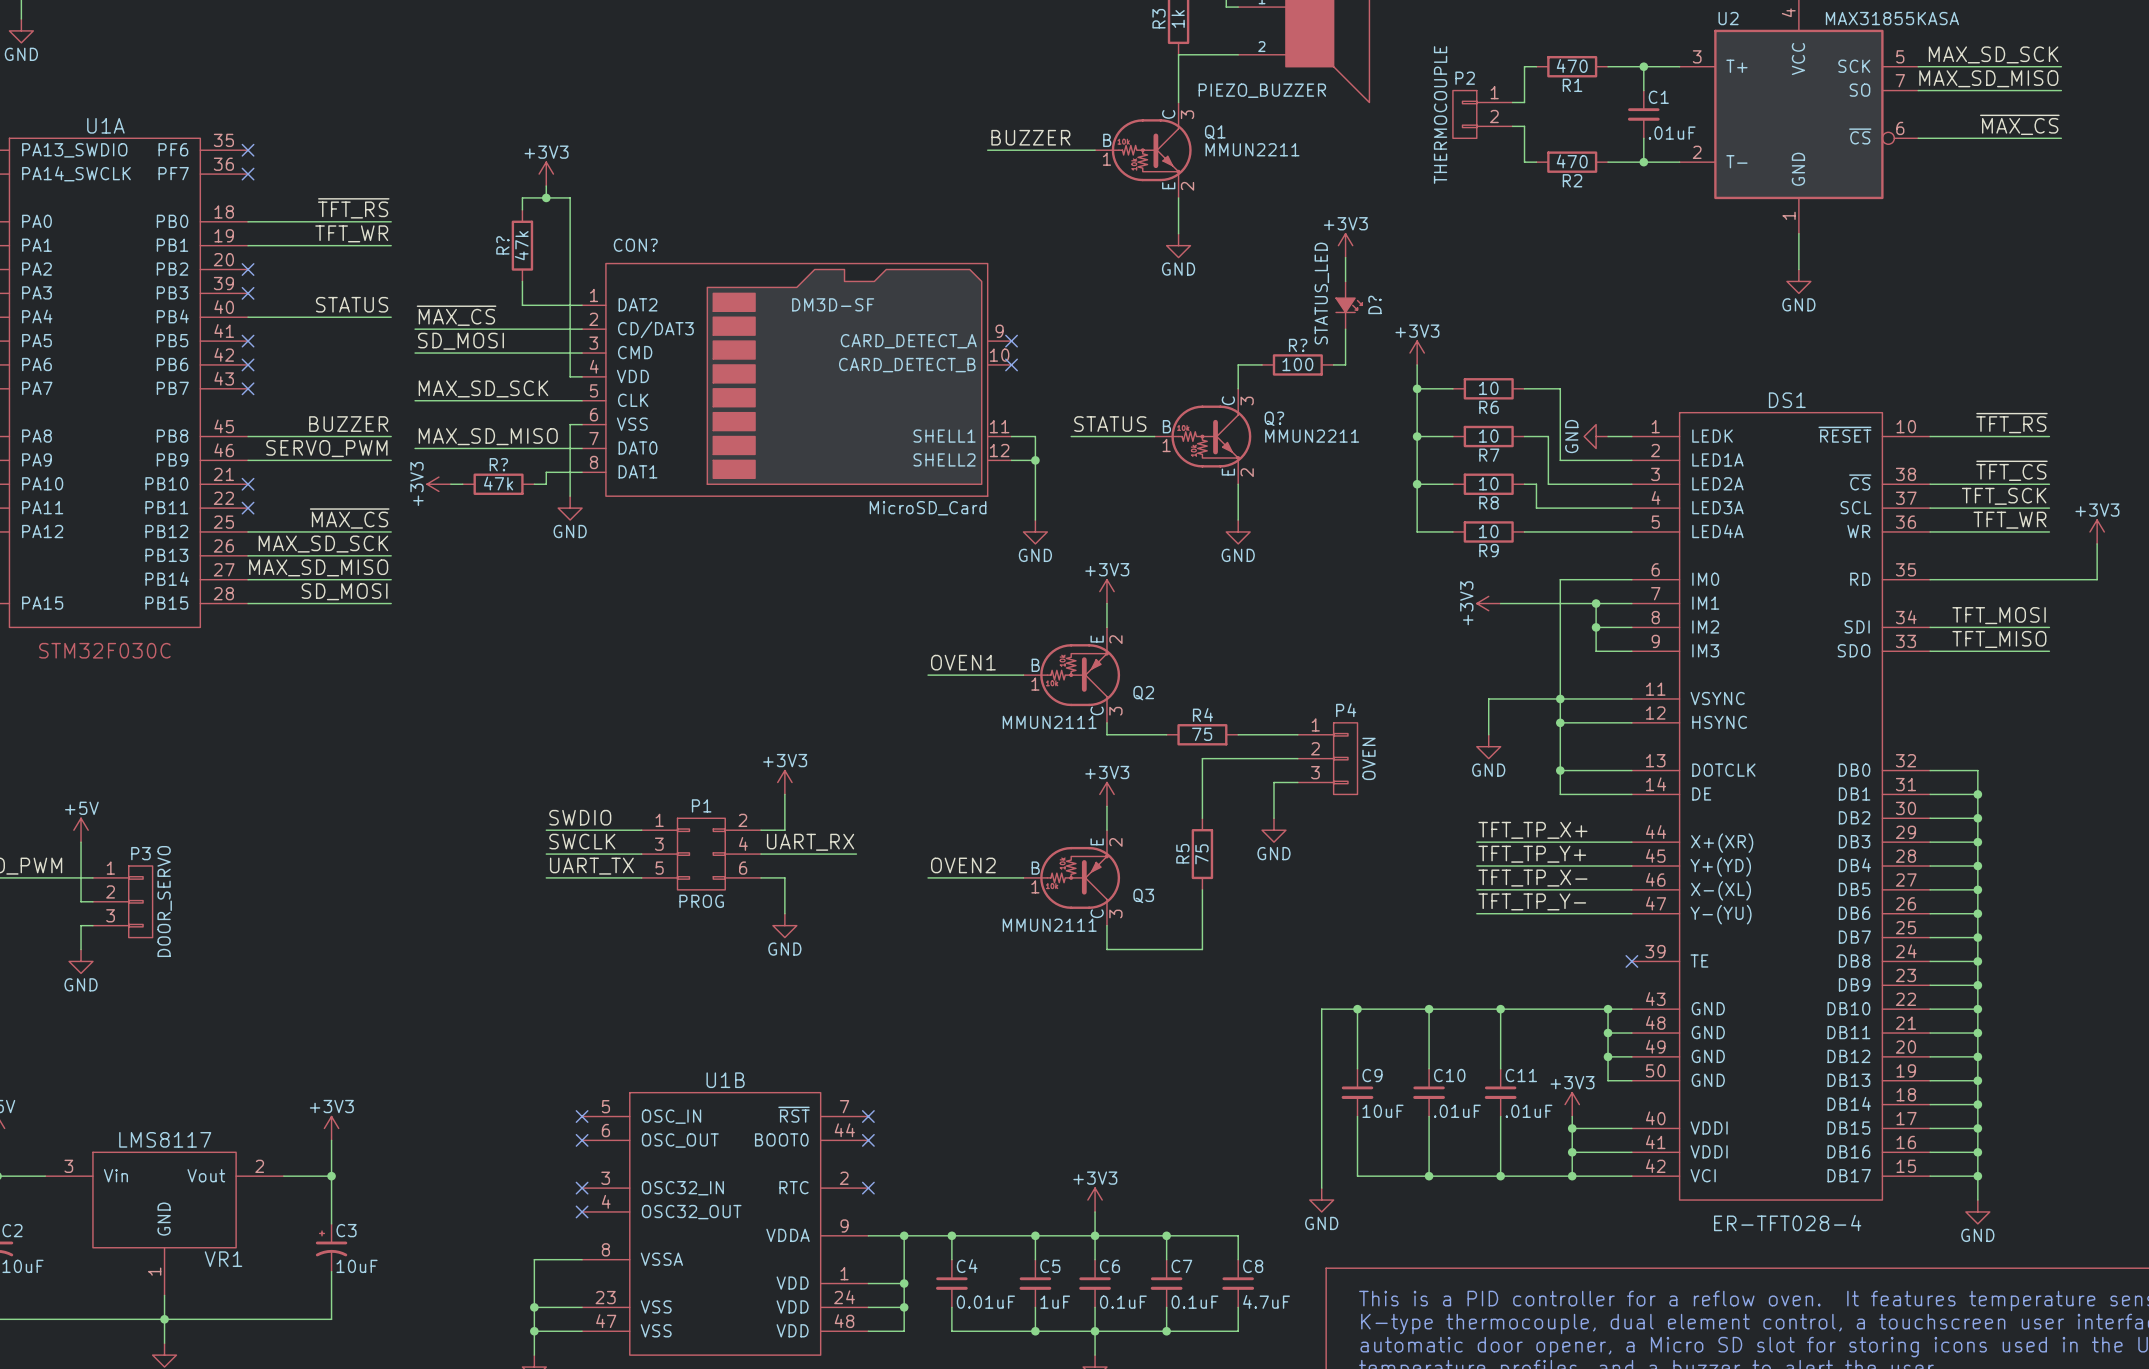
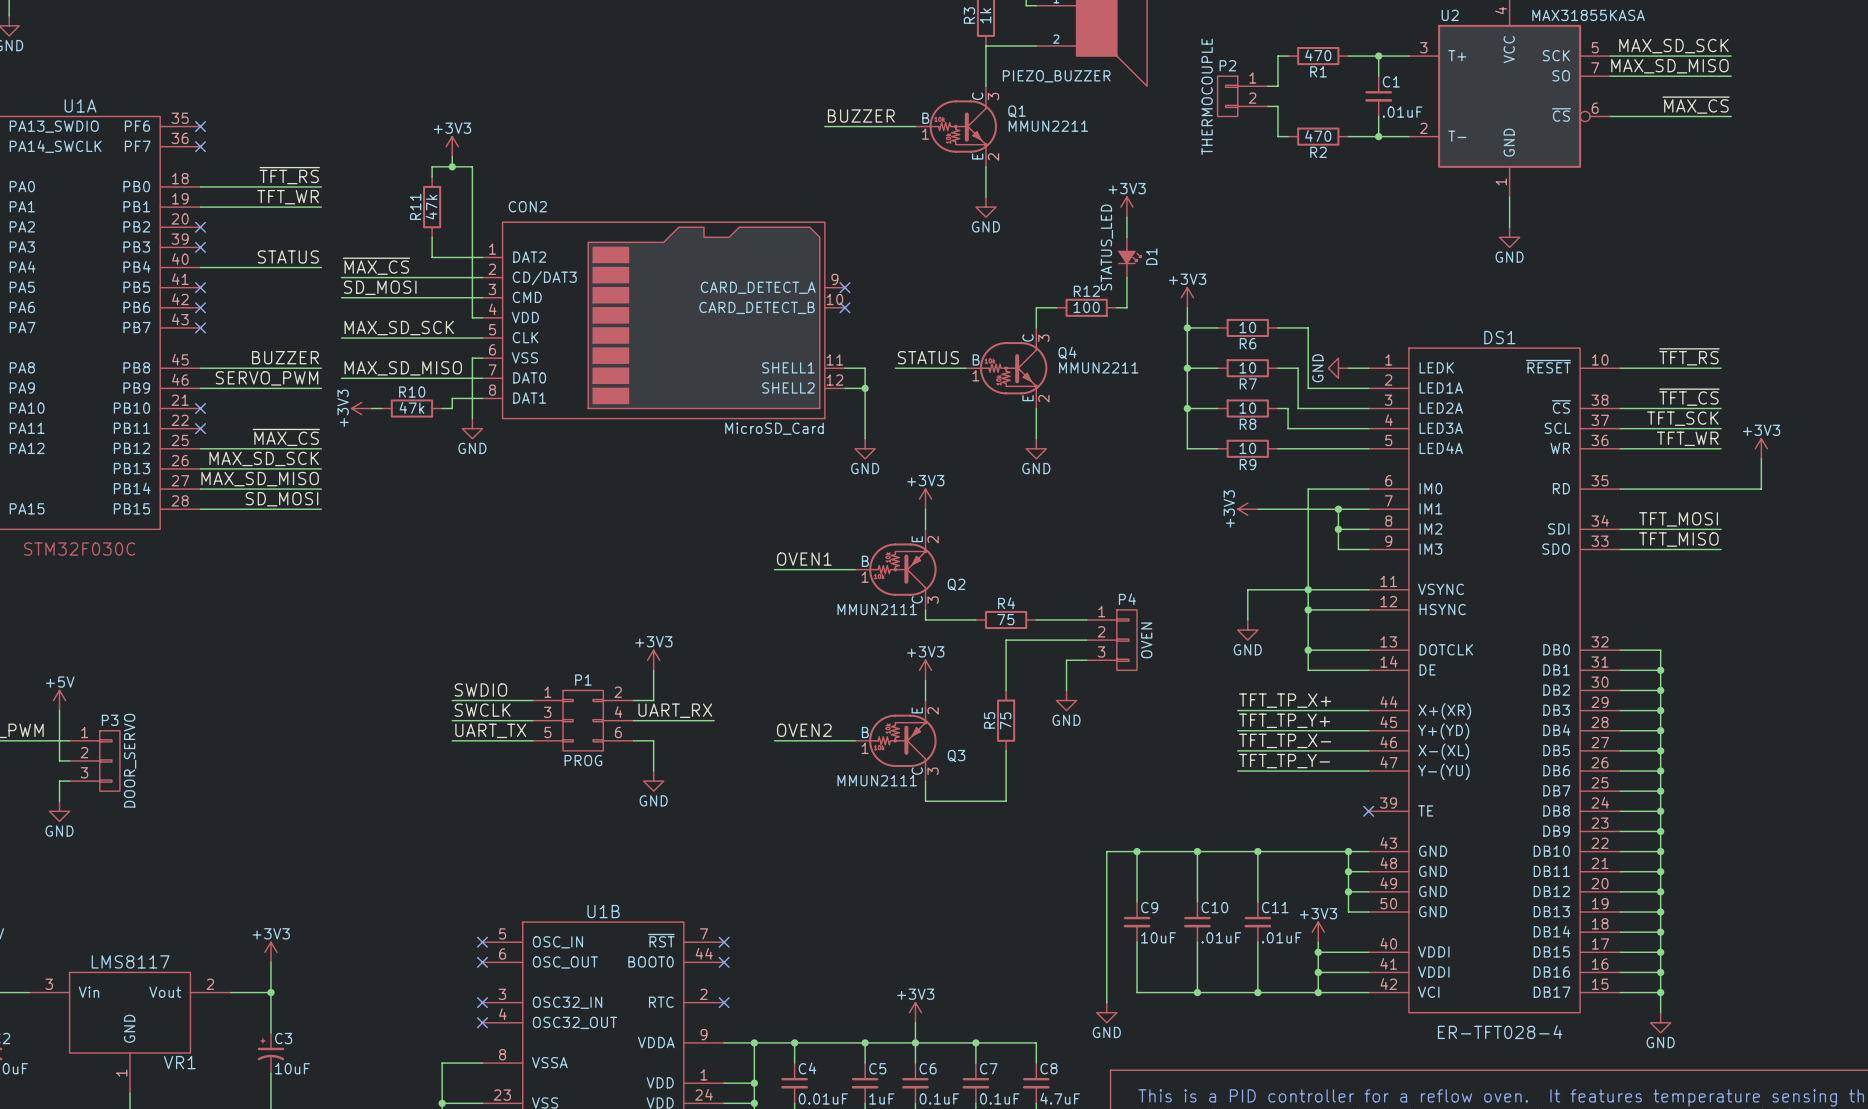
R? name: R? (502, 245) -> R11 (415, 206)
CON? name: CON? (635, 245) -> CON2 (527, 206)
CON? text: DM3D-SF (833, 304) -> none
D? name: D? (1374, 304) -> D1 (1151, 256)
R? name: R? (1298, 345) -> R12 (1086, 291)
Q? name: Q? (1274, 418) -> Q4 (1067, 352)
R? name: R? (498, 464) -> R10 (412, 392)

